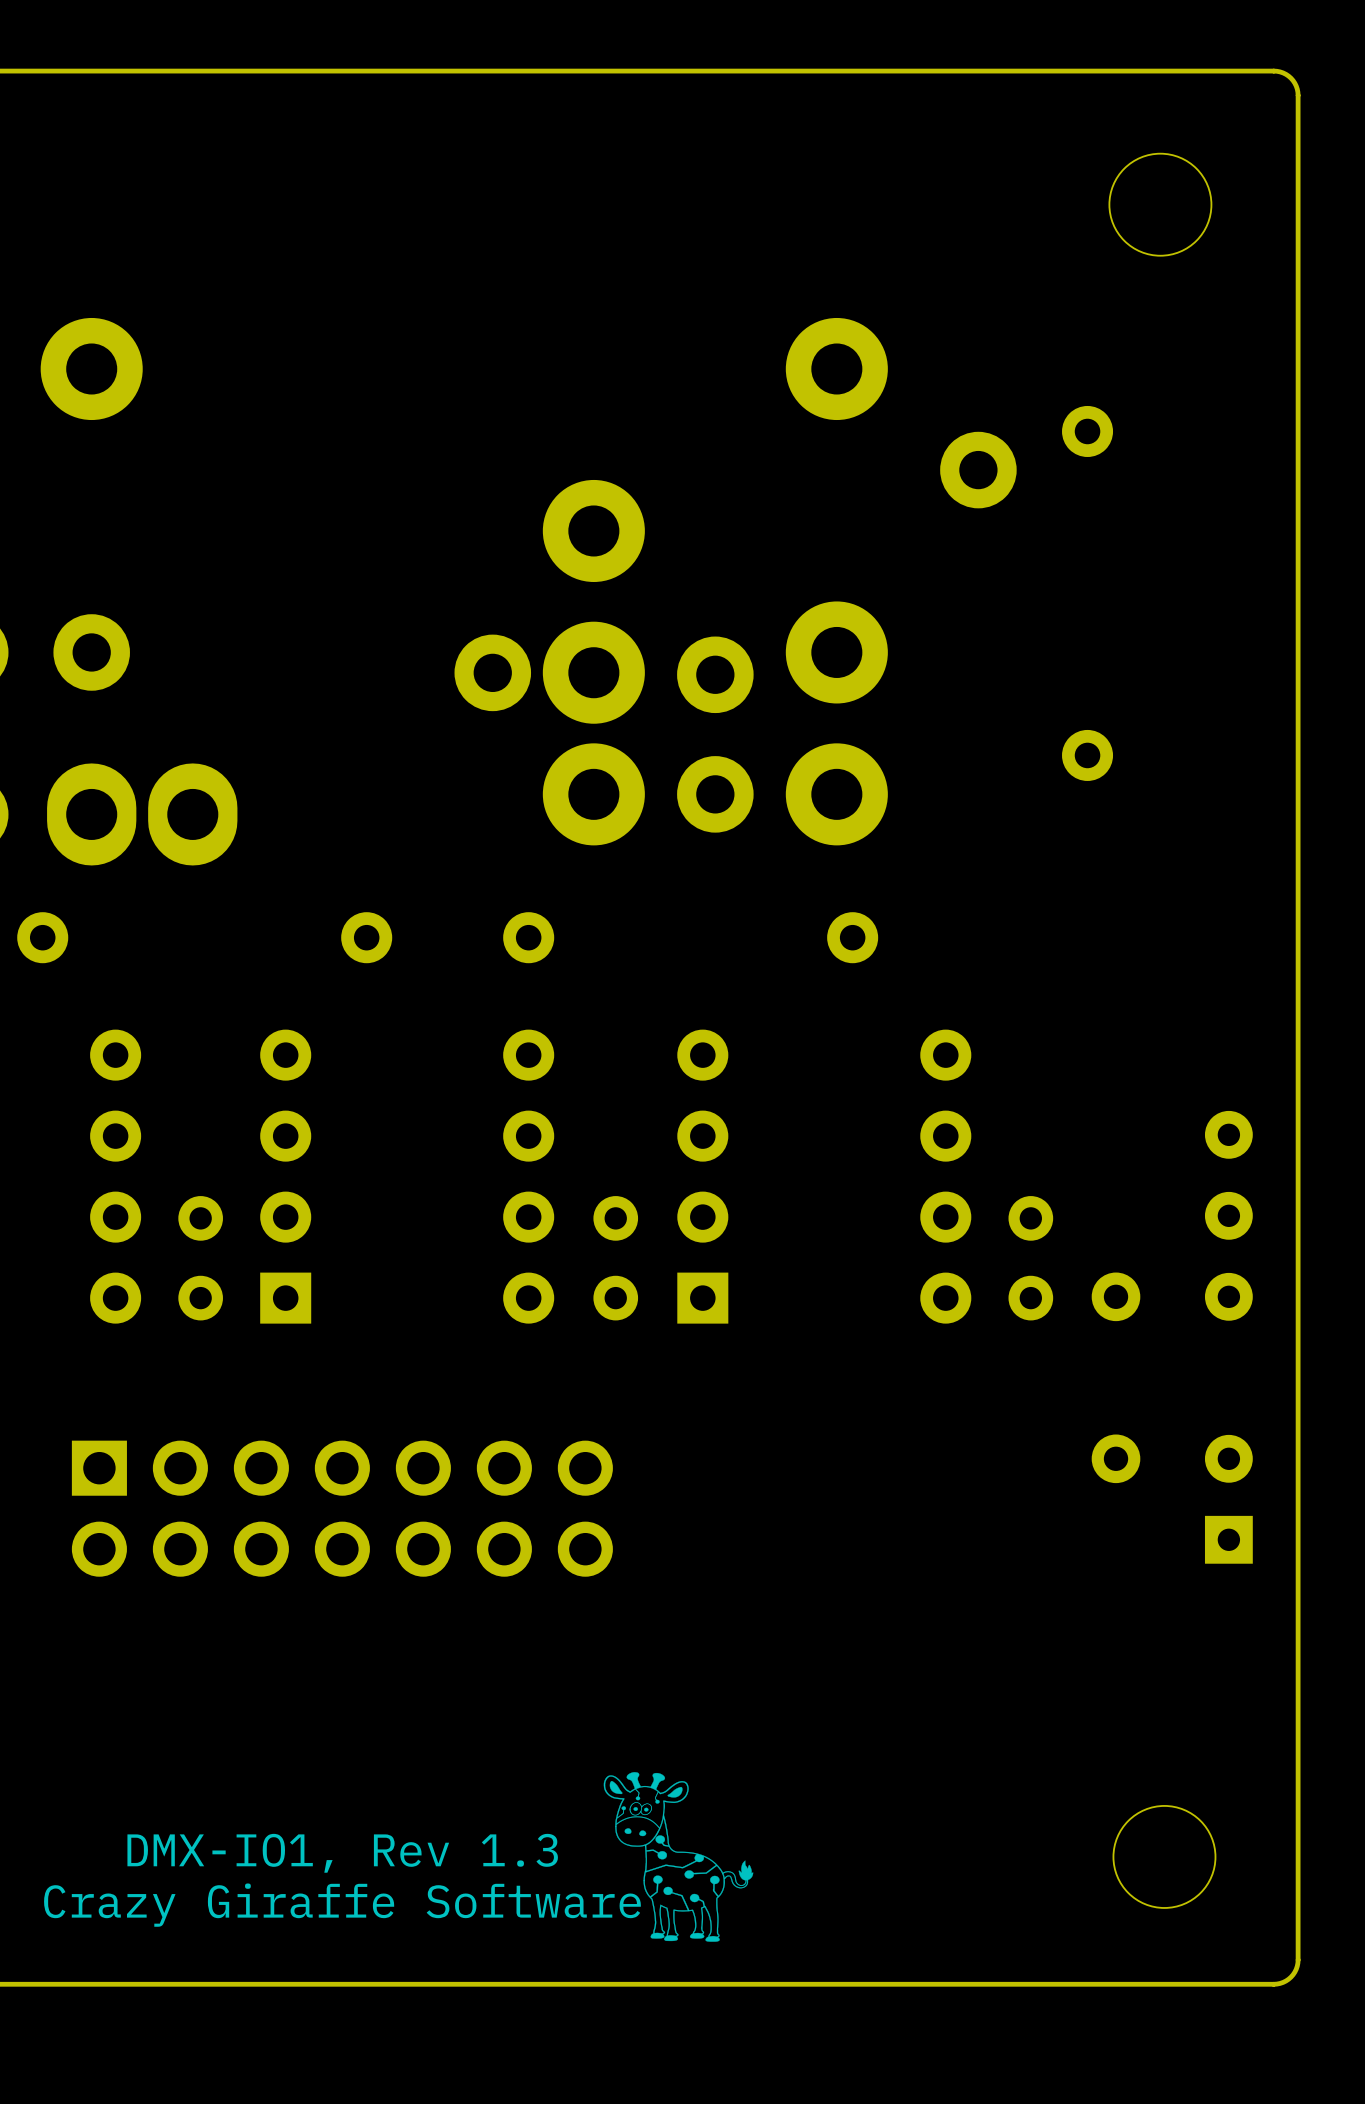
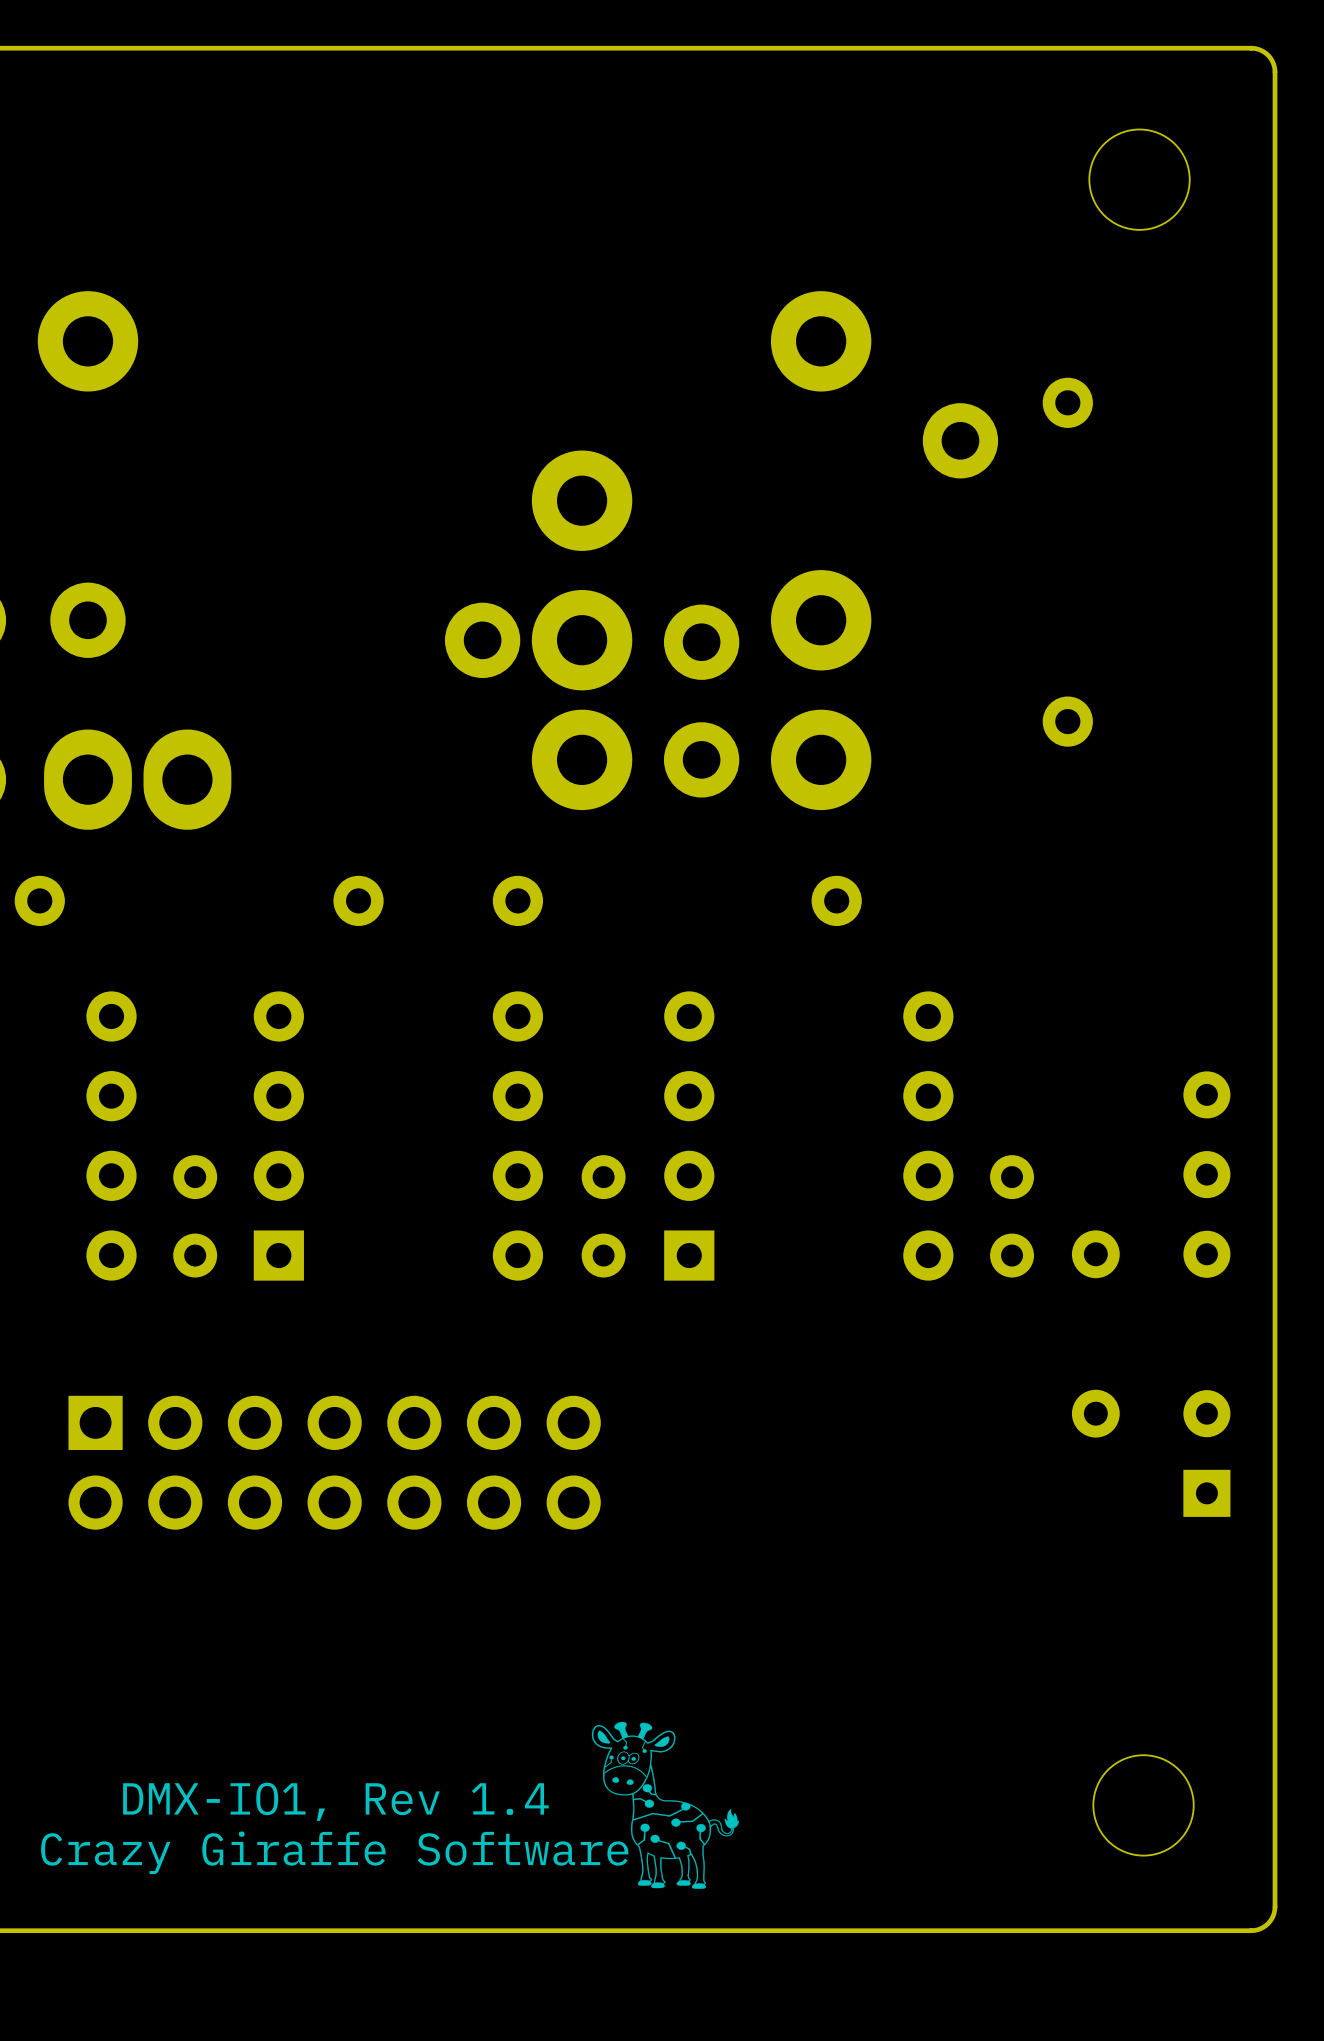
text: DMX-IO1, Rev 1.3 (342, 1853) -> DMX-IO1, Rev 1.4 (335, 1801)

